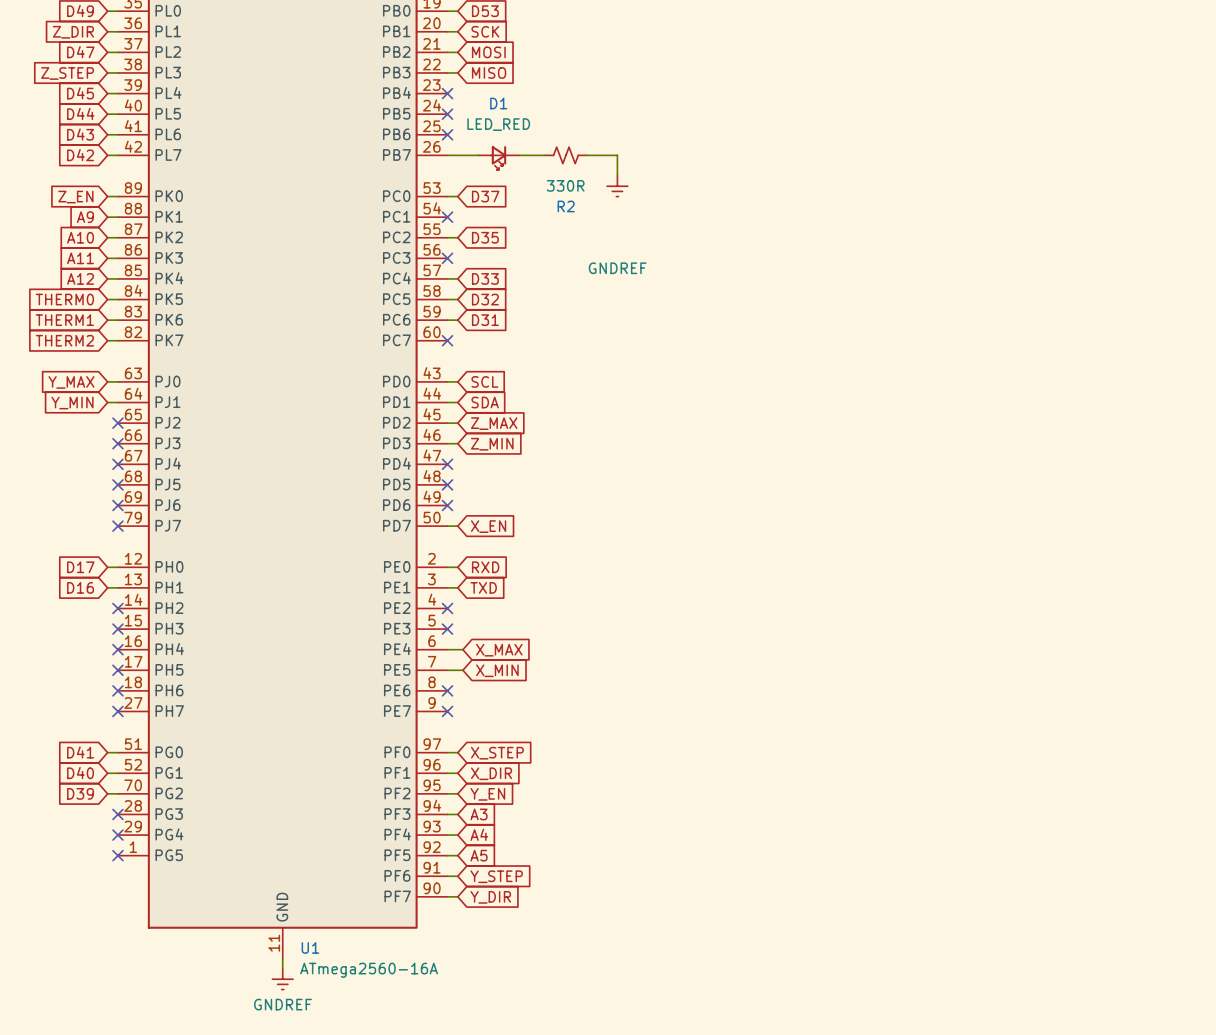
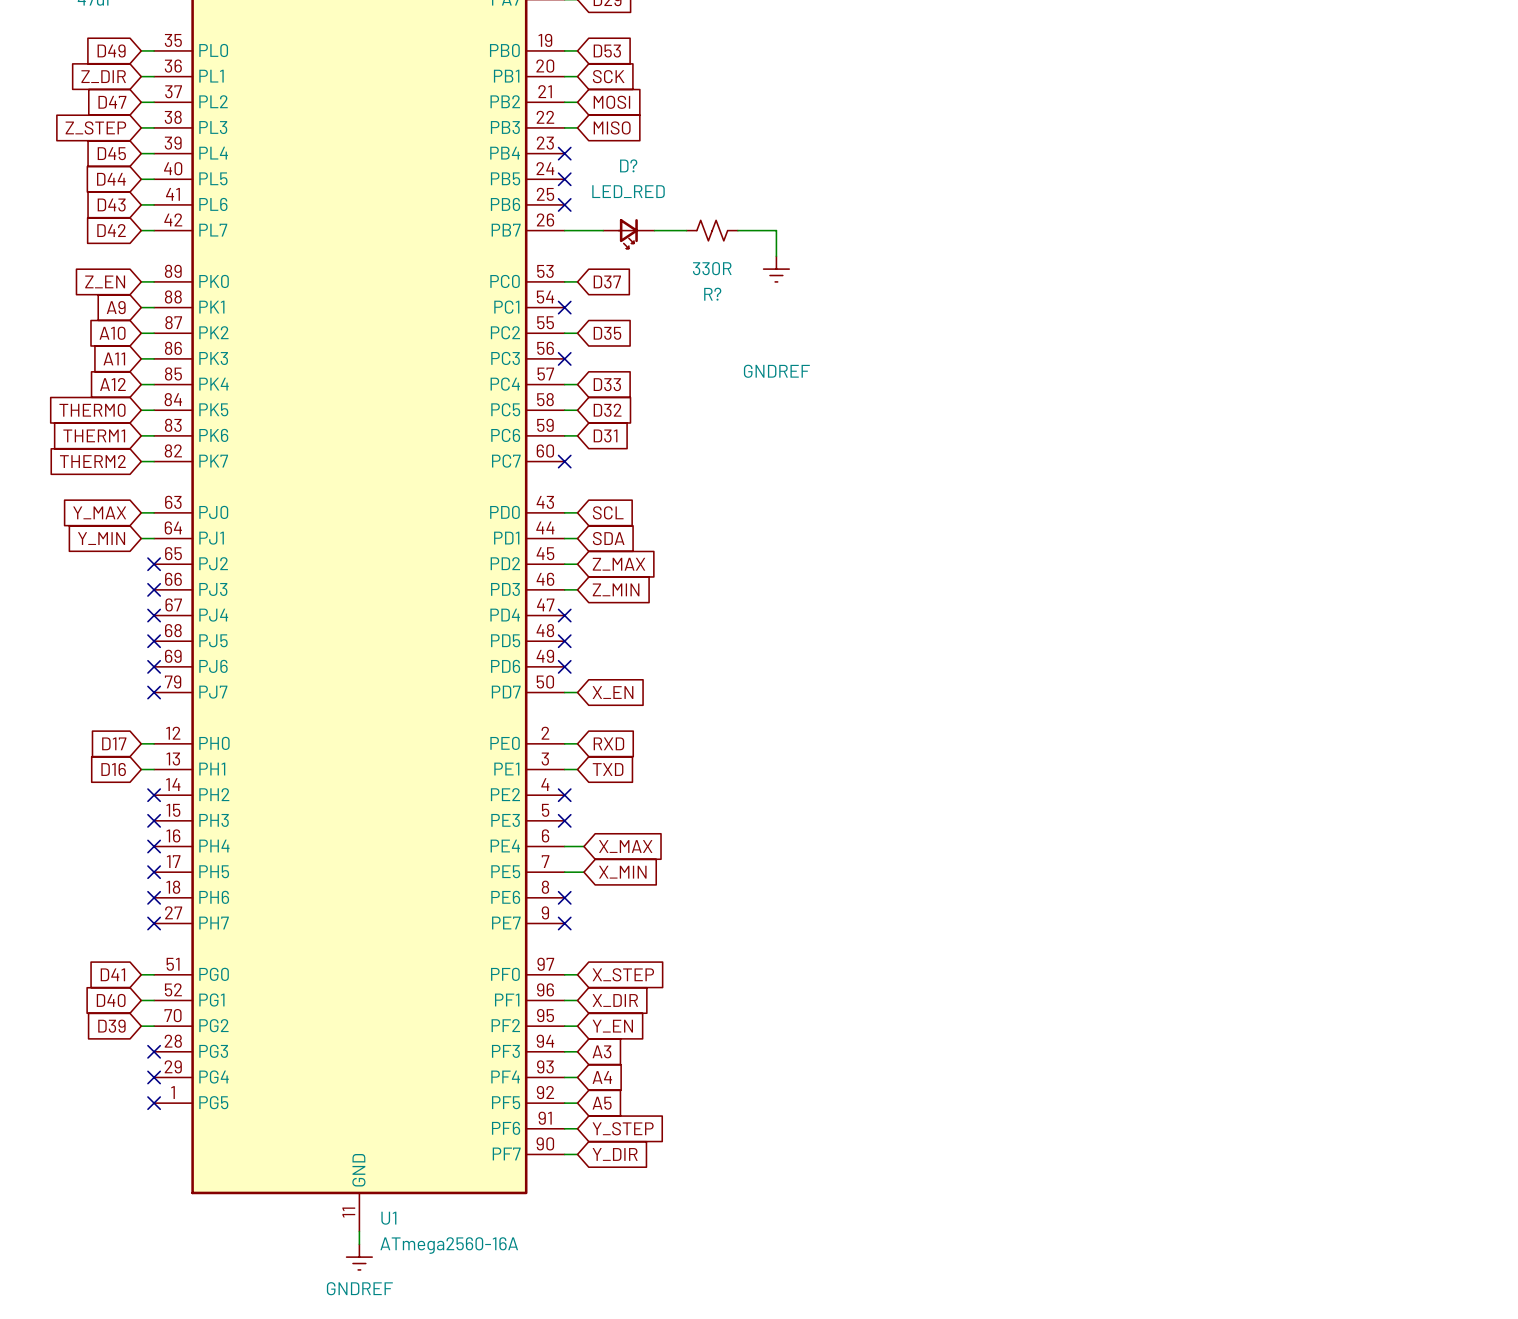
D1 name: D1 (498, 103) -> D? (628, 165)
R2 name: R2 (566, 206) -> R? (712, 294)

